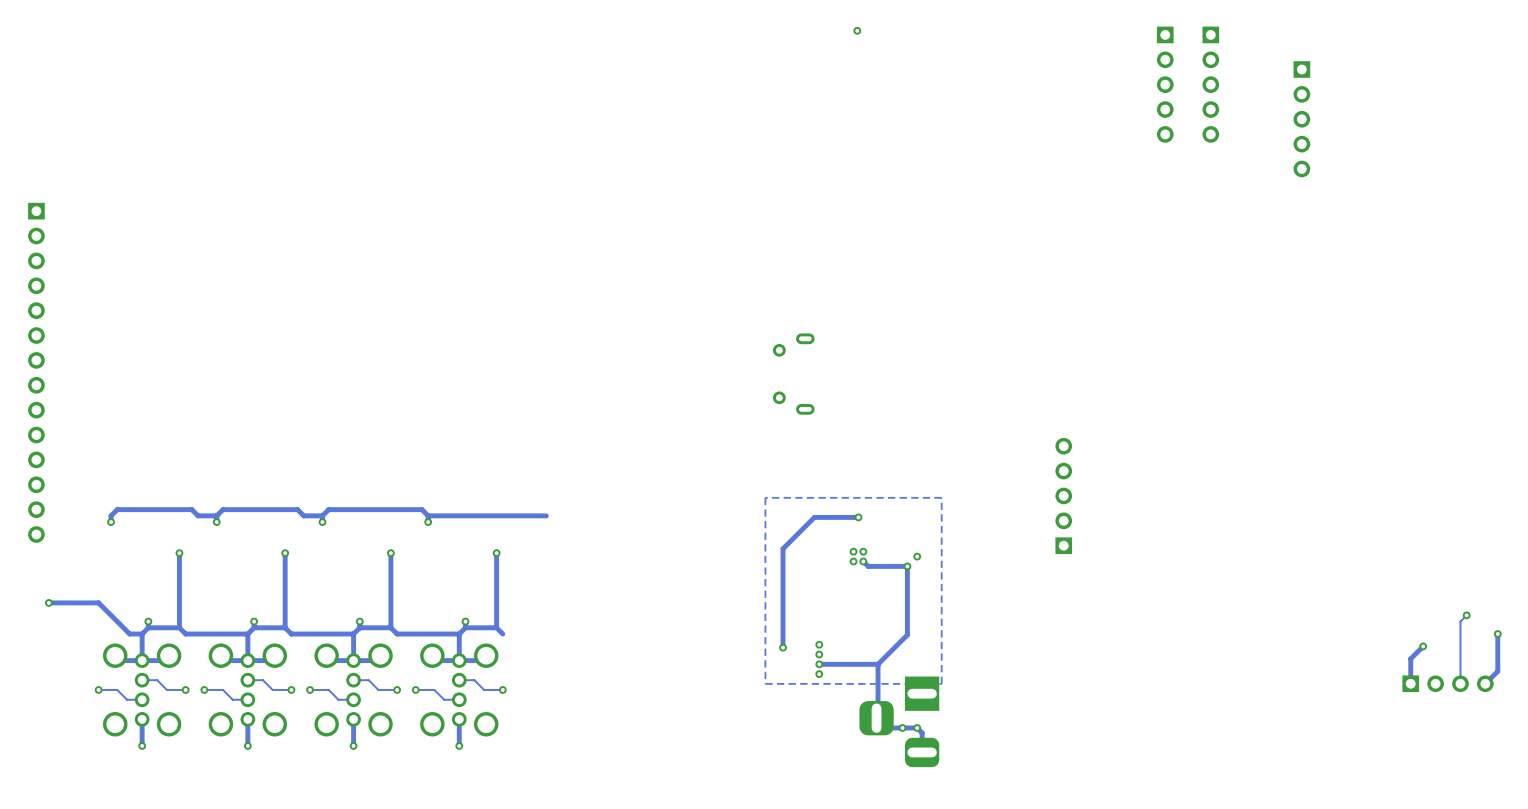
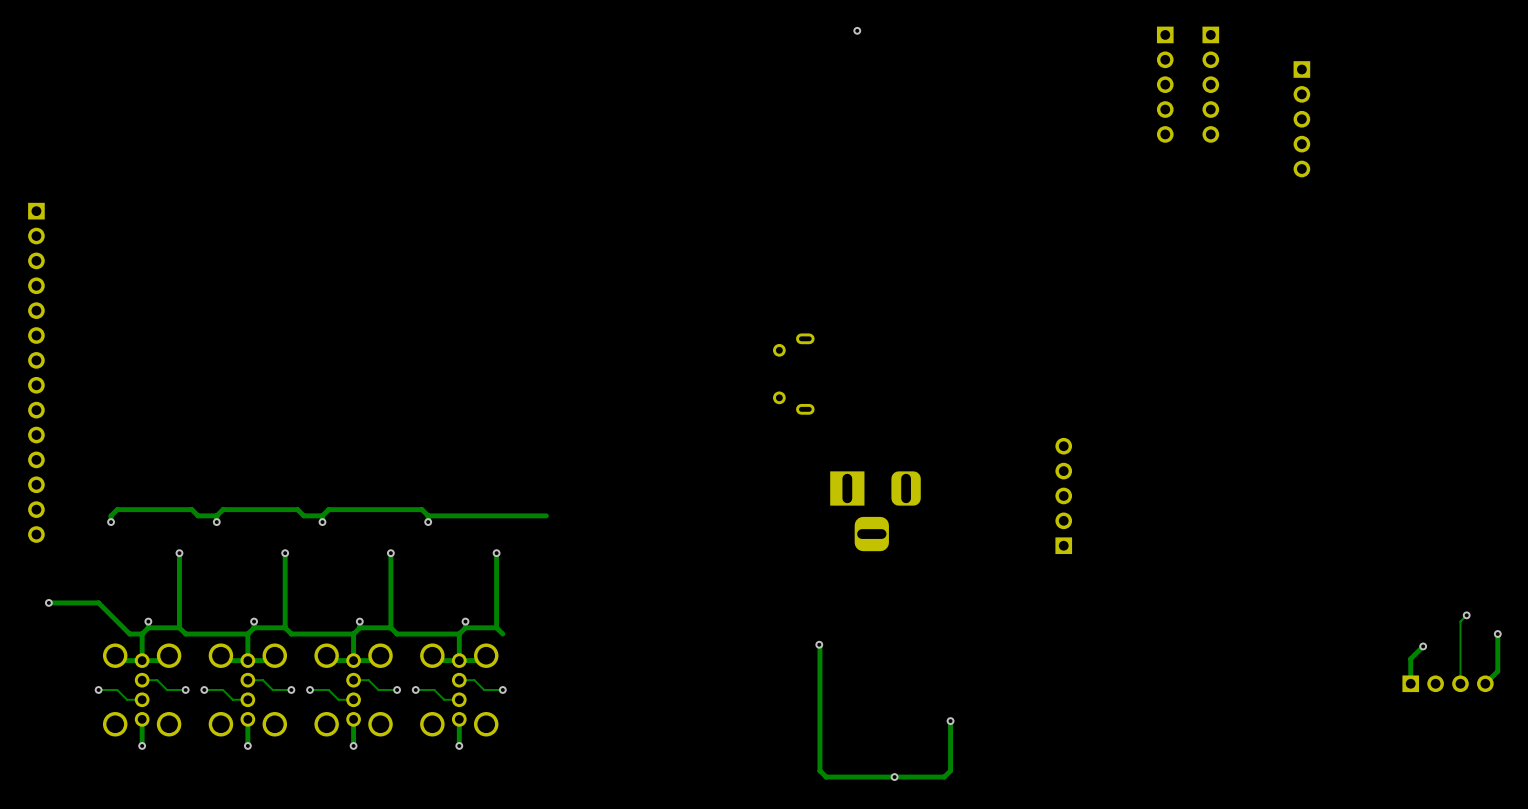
zone outline: (941, 497) (941, 683) (765, 683) (765, 497) (941, 497) -> none
track: (858, 517) (814, 517) (783, 548) (783, 647) -> none
via: (858, 517) -> none
via: (853, 551) -> none
via: (863, 551) -> none
via: (917, 556) -> none
via: (853, 561) -> none
track: (863, 561) (868, 566) (907, 566) (907, 634) (878, 664) -> none
via: (863, 561) -> none
via: (907, 566) -> none
track: none -> (819, 646) (819, 770) (826, 777) (944, 777) (950, 770) (950, 721)
via: (783, 647) -> none
via: (819, 654) -> none
via: (819, 664) -> none
track: (878, 664) (819, 664) -> none
track: (878, 664) (876, 718) (886, 727) (917, 727) (922, 732) (922, 752) -> none
via: (819, 674) -> none
part rotation: 0° (899, 721) -> 90° counterclockwise (875, 511)
part position: (899, 721) -> (875, 511)
via: none -> (950, 721)
via: (902, 727) -> none
via: (917, 727) -> none
via: none -> (894, 777)

